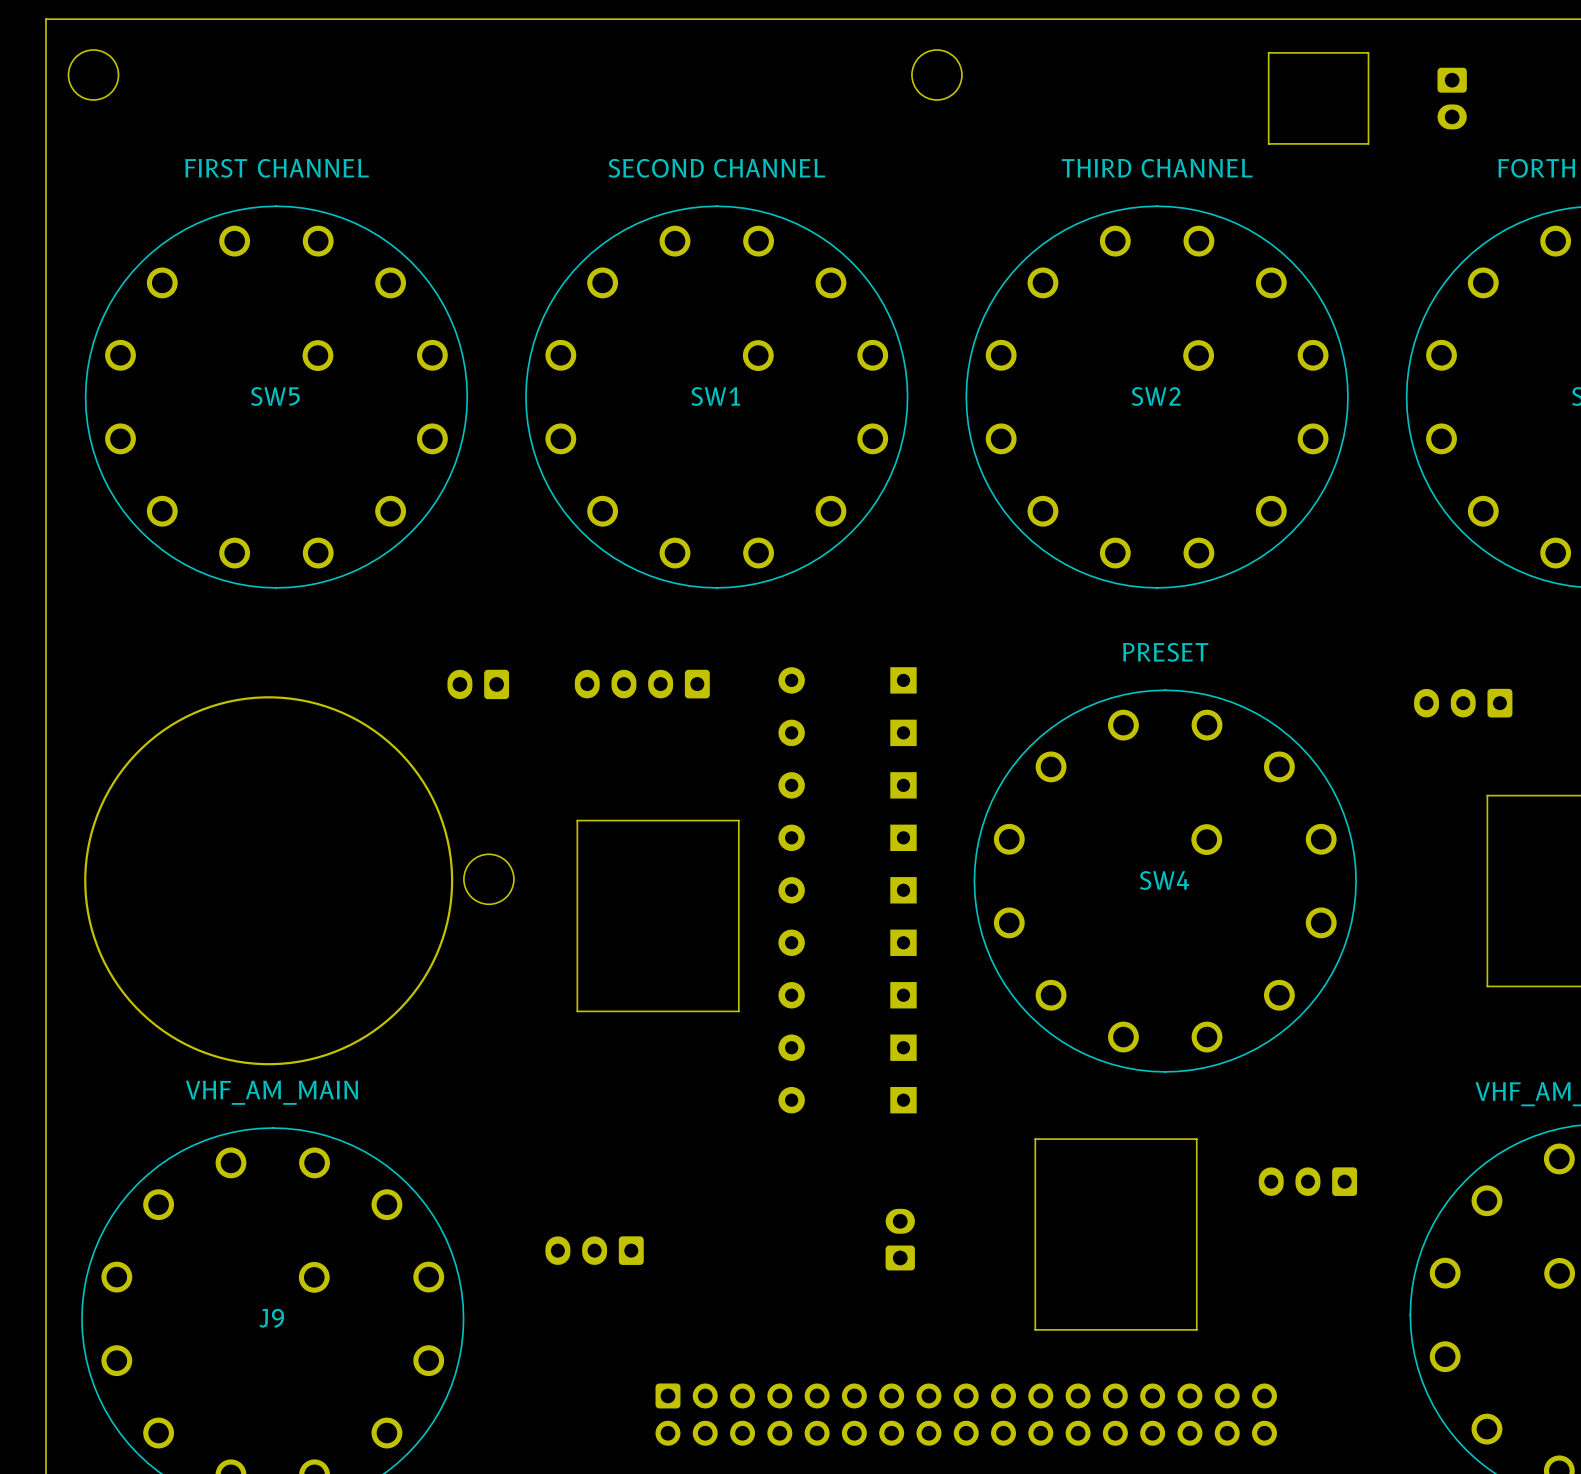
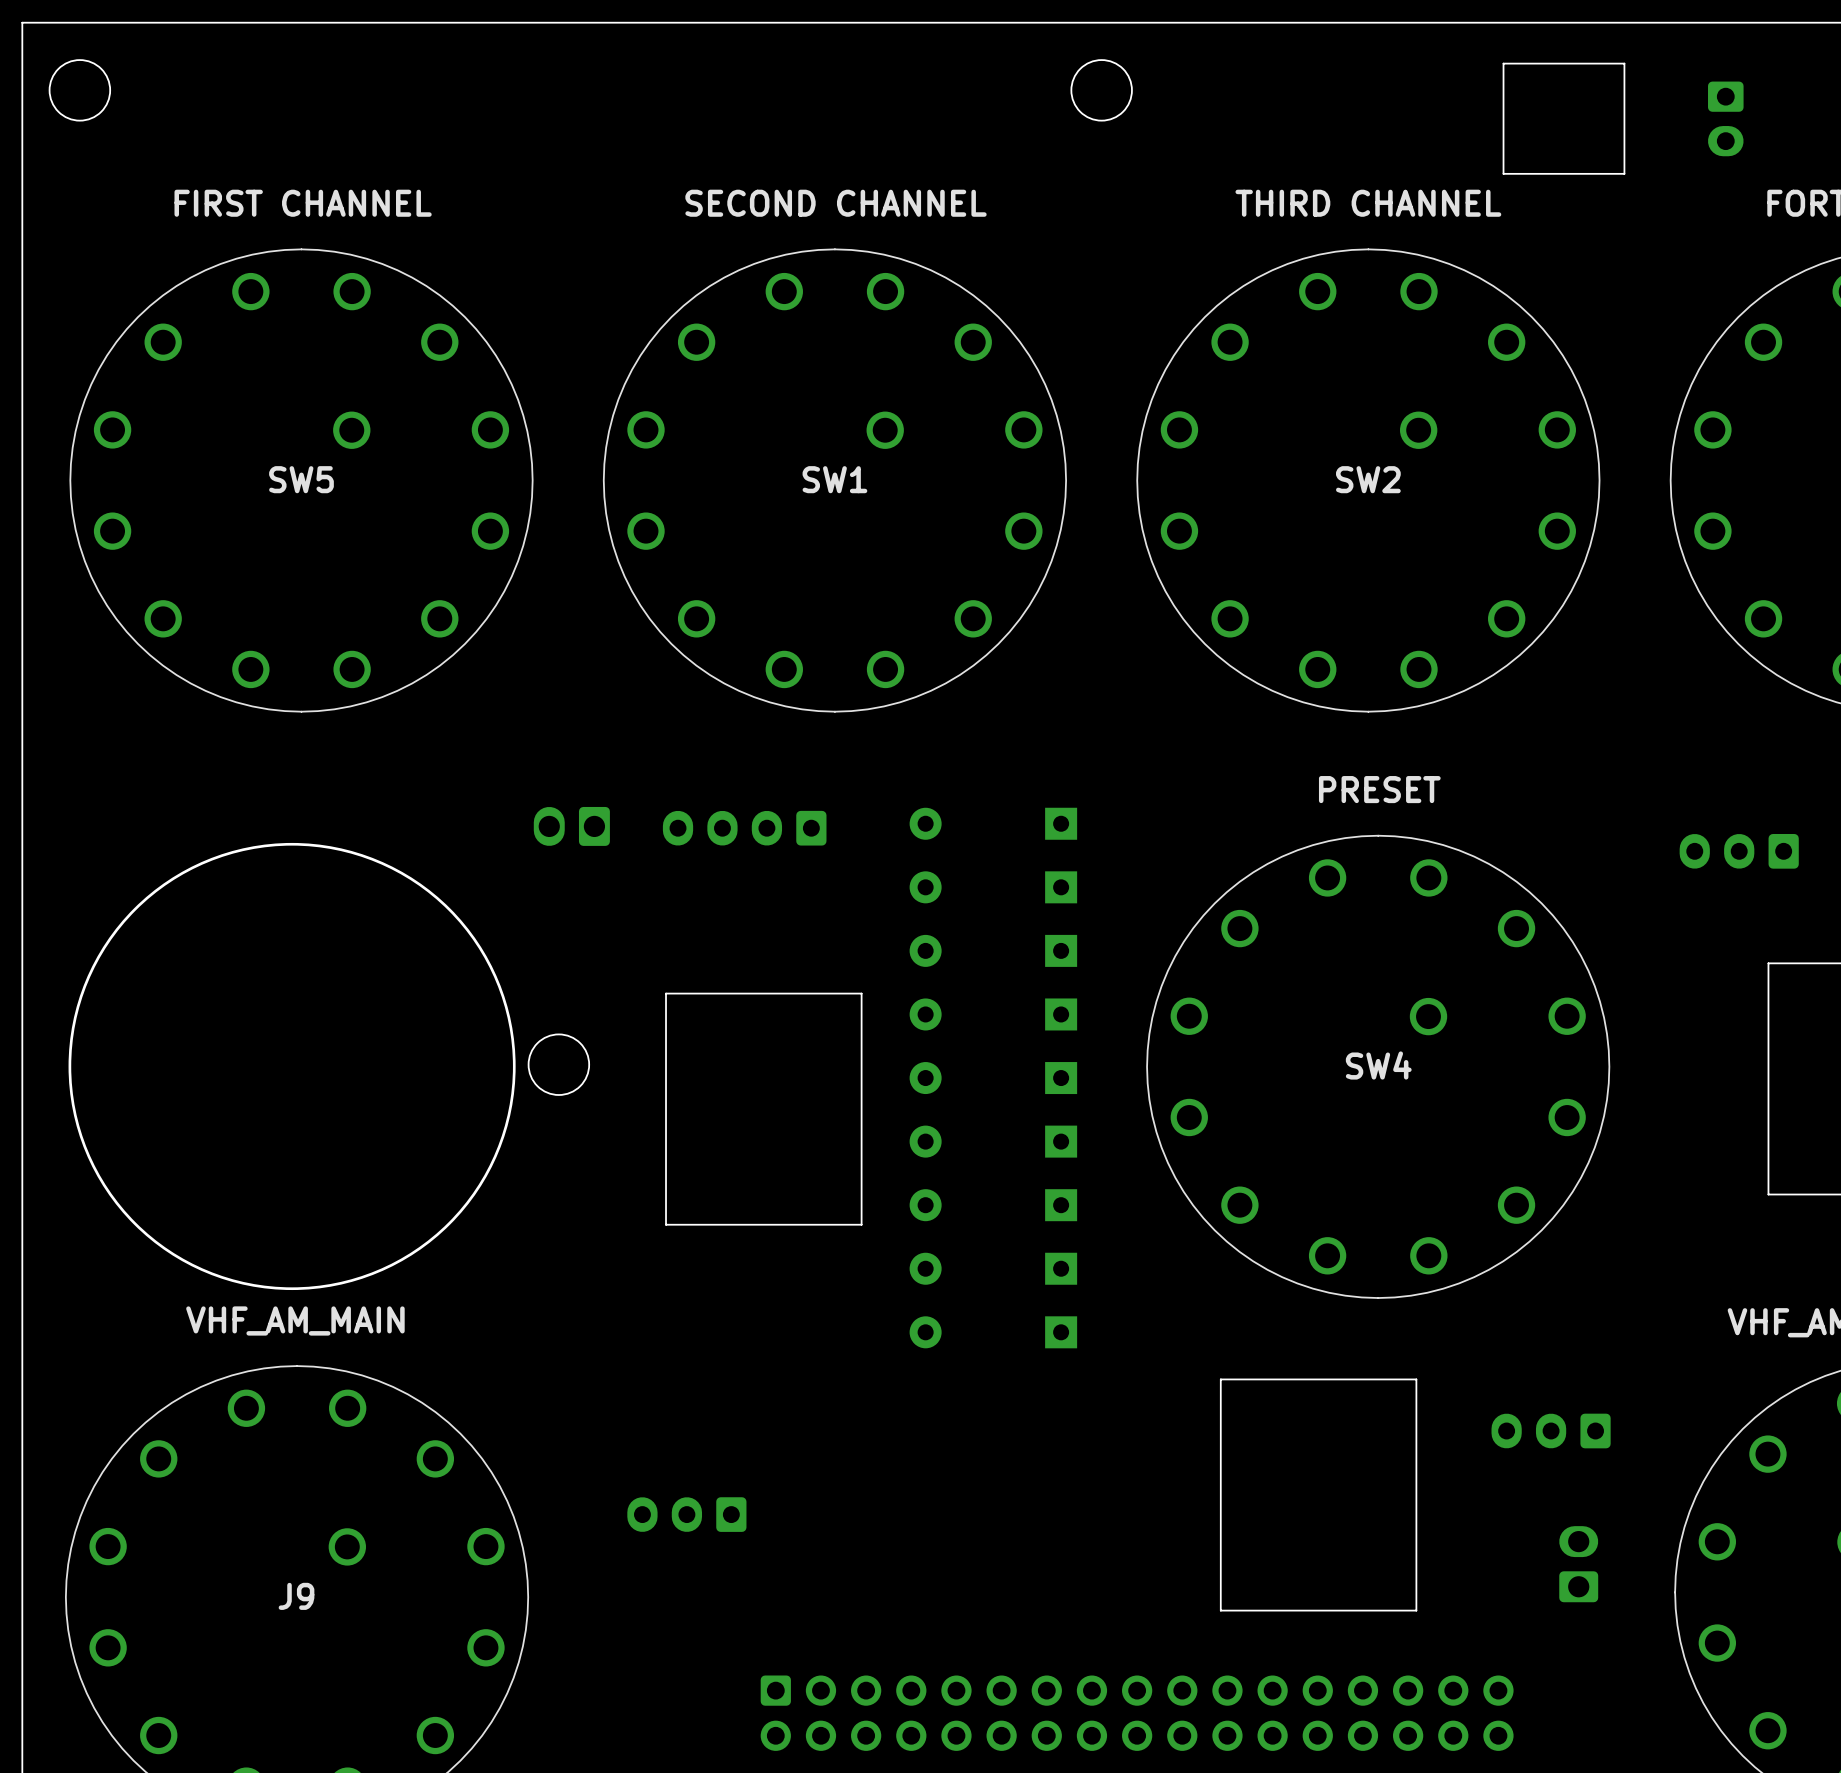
part: none -> (571, 826)
part: (478, 684) -> none
part: (900, 1239) -> none
part: none -> (1578, 1564)

